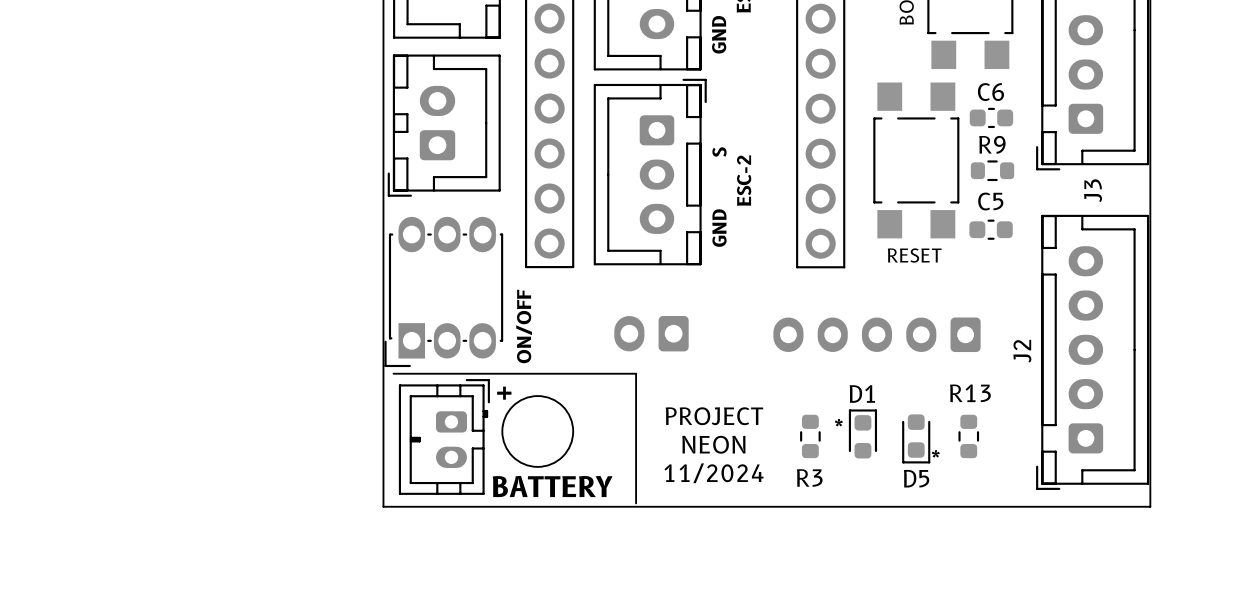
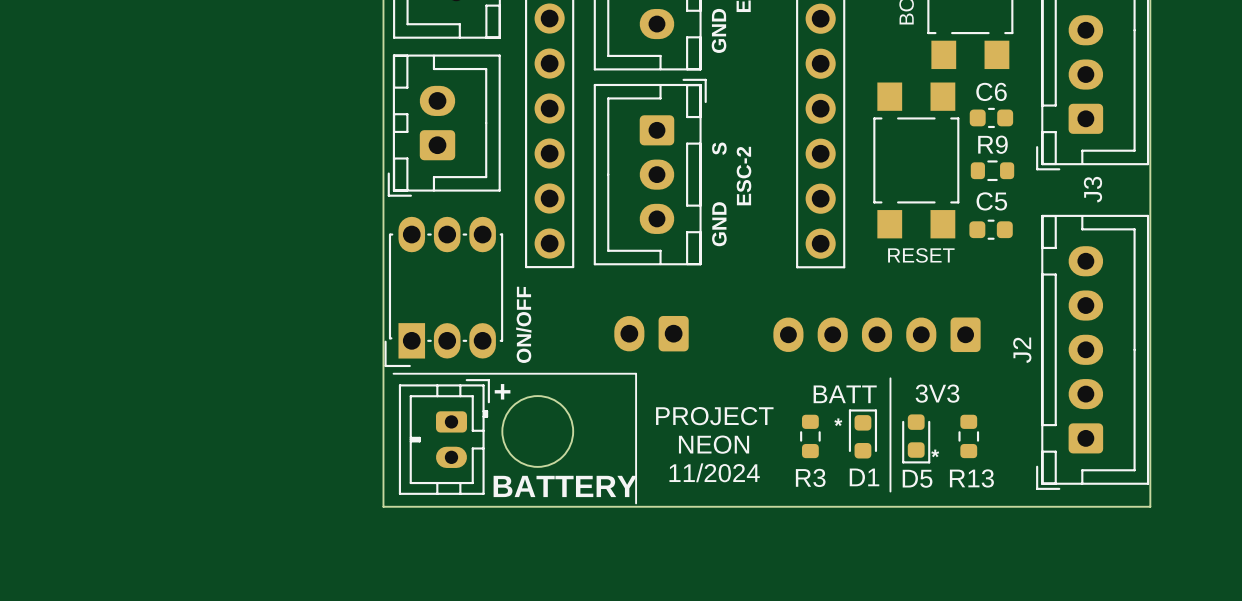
line: none -> (890, 378) (890, 491)
D1 name position: D1 (862, 393) -> D1 (864, 477)
text: none -> 3V3 (937, 393)
R13 name position: R13 (970, 393) -> R13 (971, 478)
text: none -> BATT (845, 394)

